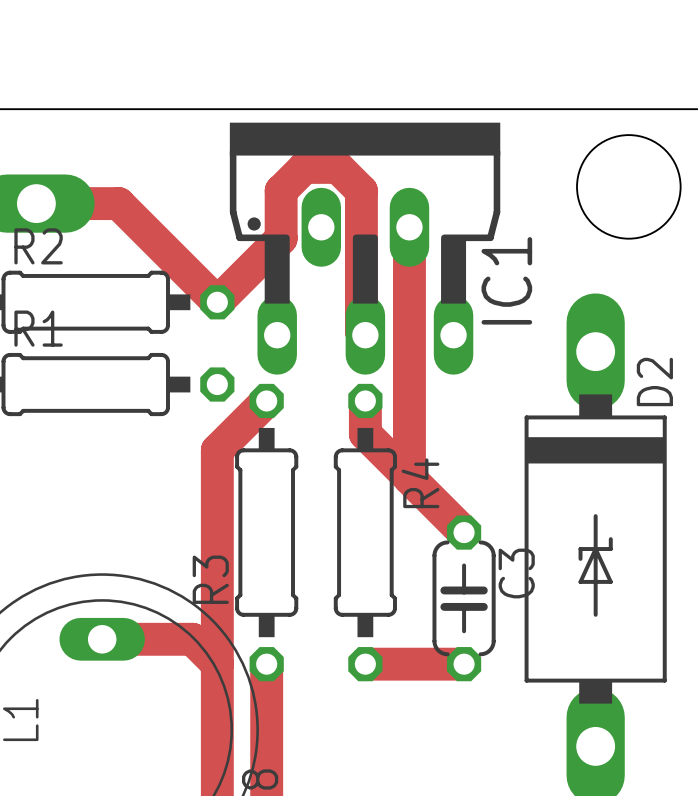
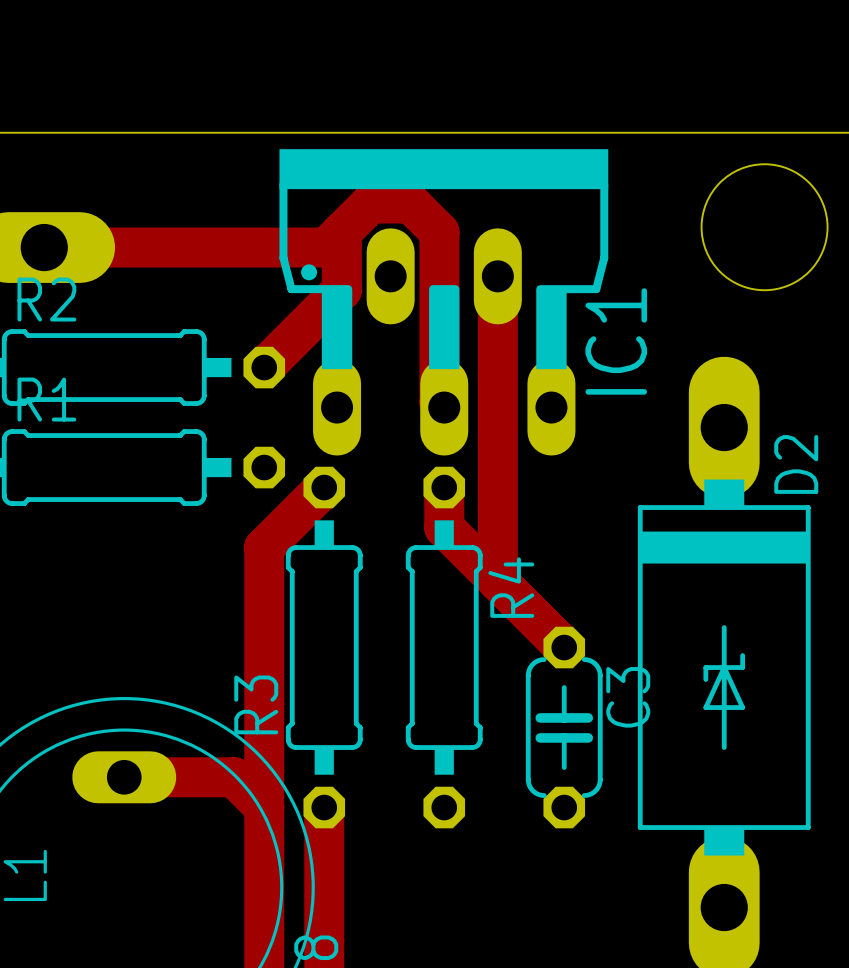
track: (118, 203) (217, 302) -> (144, 247) (326, 247) (341, 232)
track: (365, 664) (464, 664) -> none

